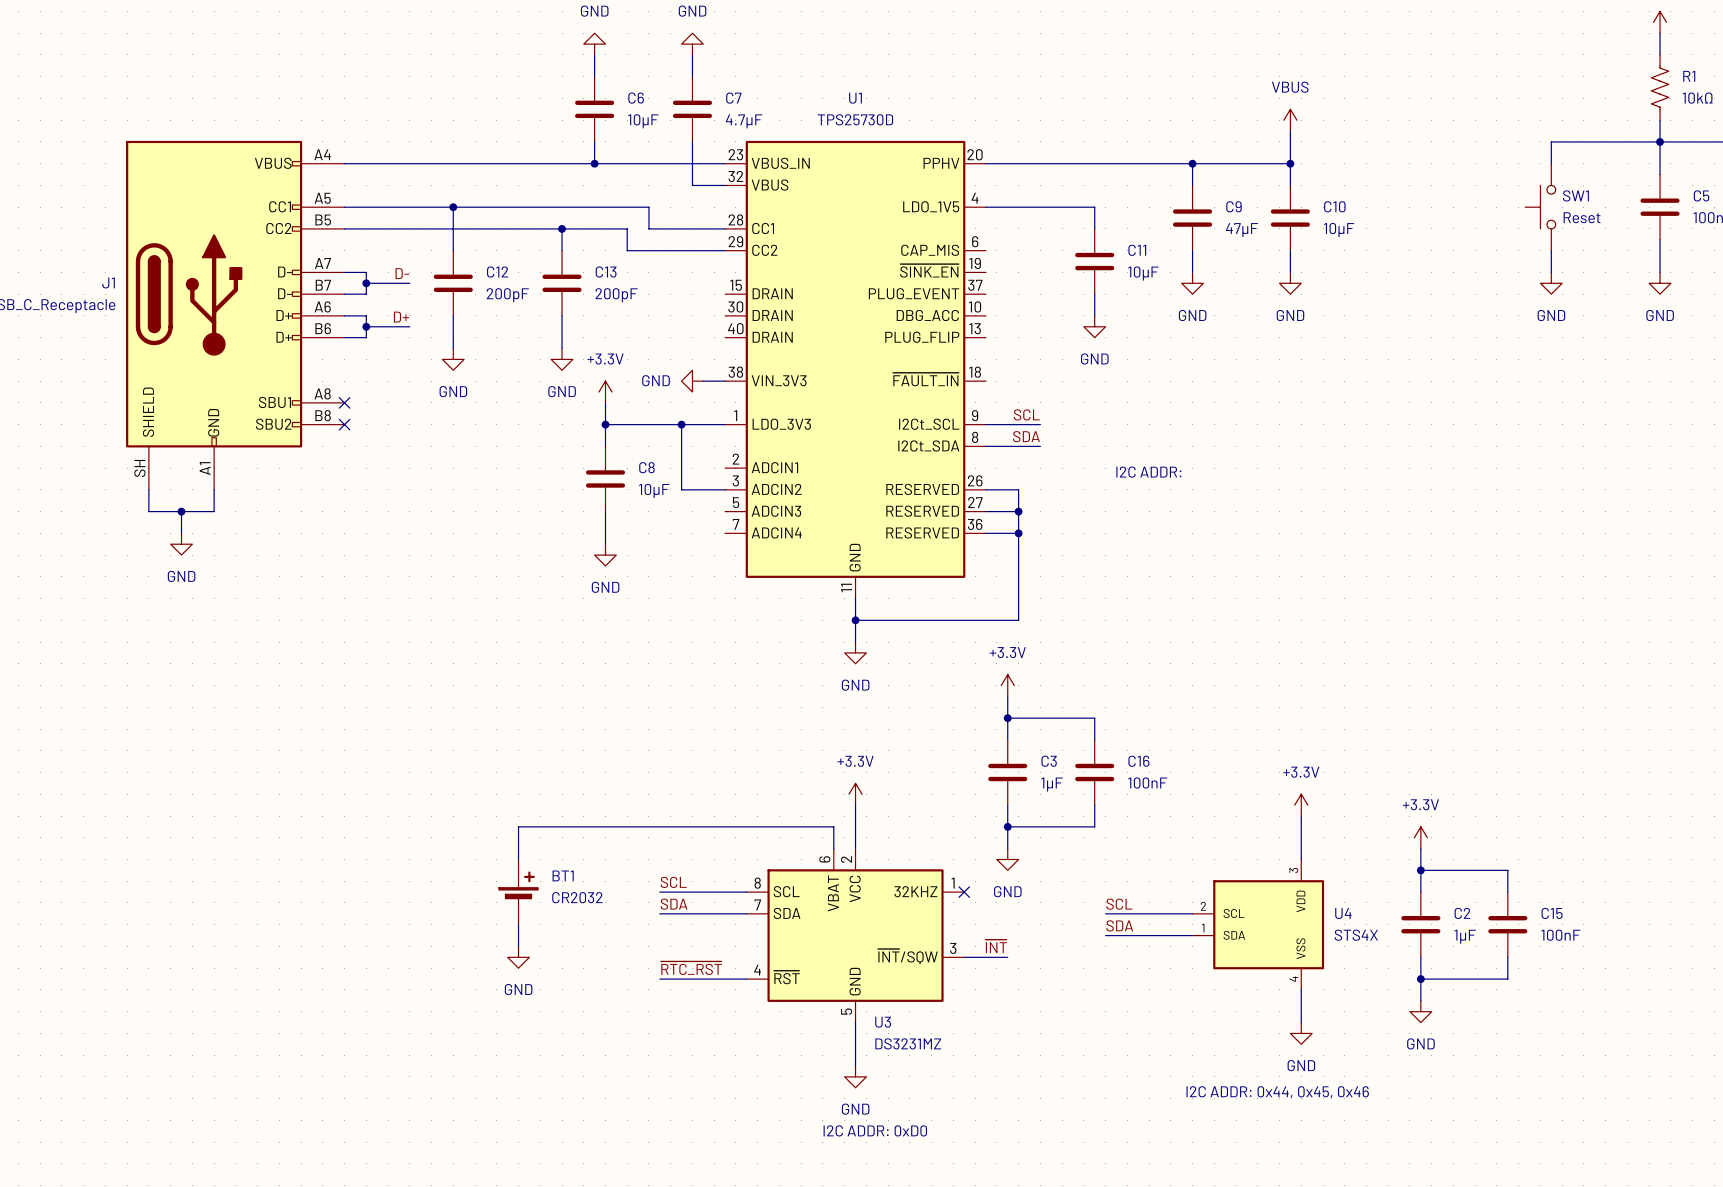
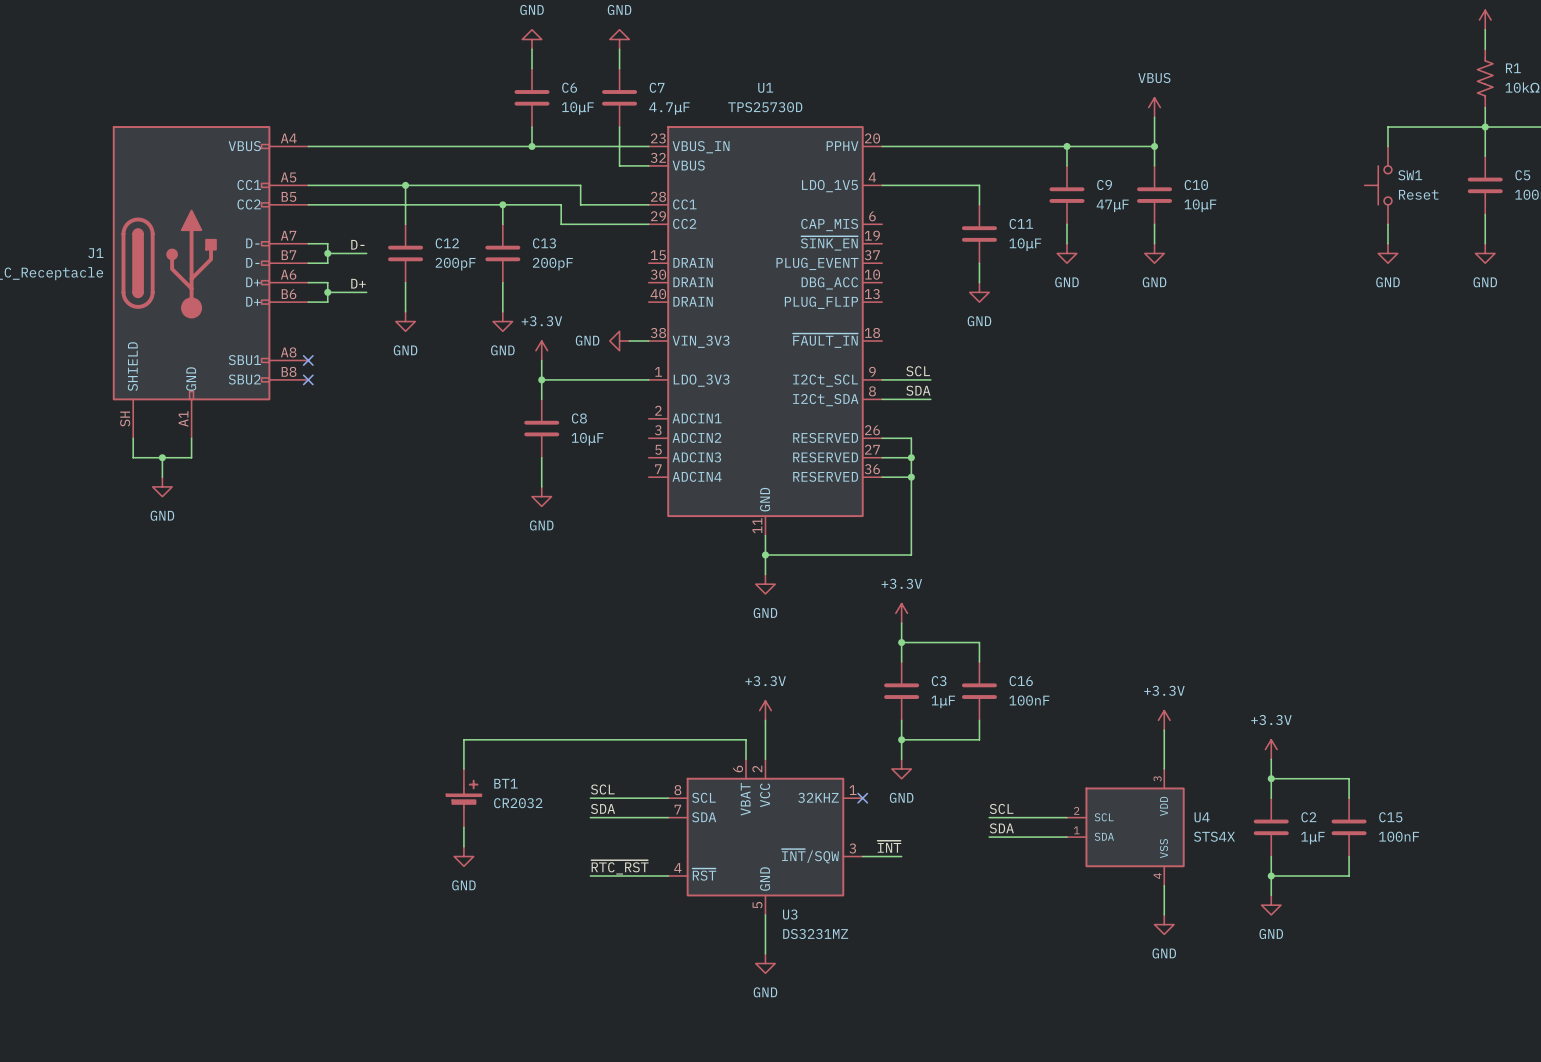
wire: (681, 424) (681, 489) (725, 489) -> none
junction: (681, 424) -> none
text: I2C ADDR: (1148, 472) -> none
text: I2C ADDR: 0x44, 0x45, 0x46 (1277, 1092) -> none
text: I2C ADDR: 0xD0 (875, 1130) -> none

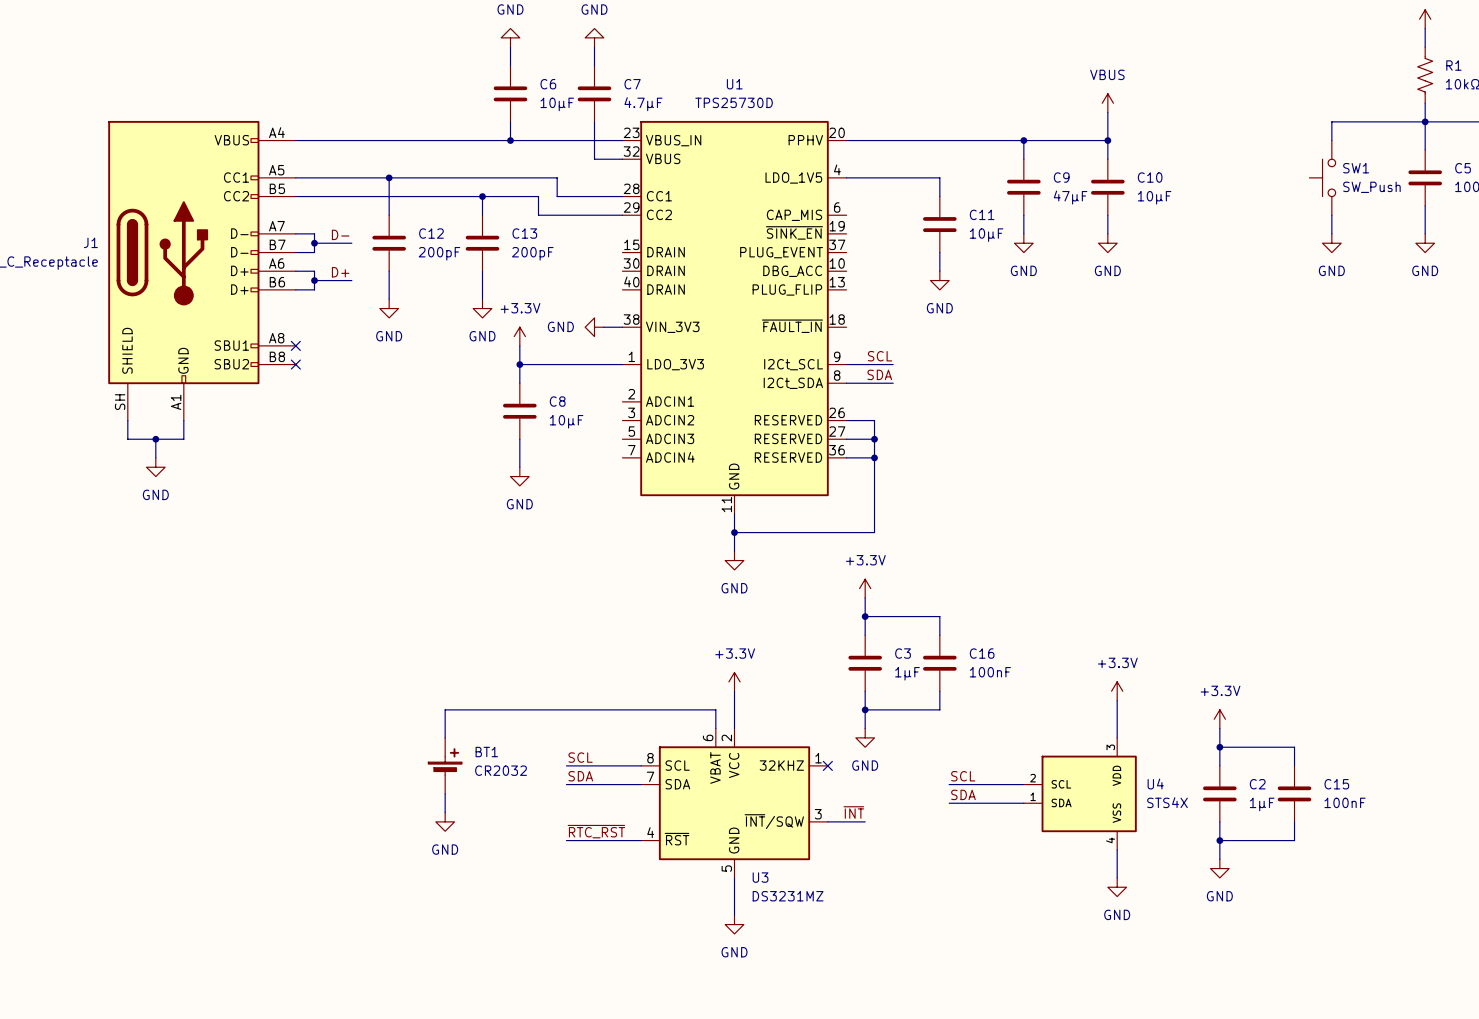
SW1 value: Reset (1418, 194) -> SW_Push (1371, 187)

